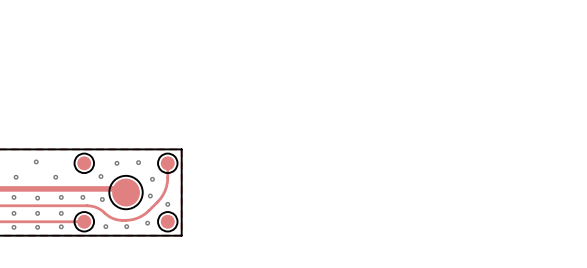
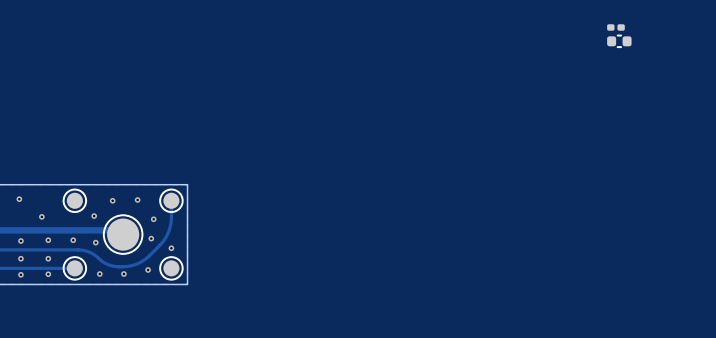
part: none -> (615, 27)
part: none -> (619, 41)

